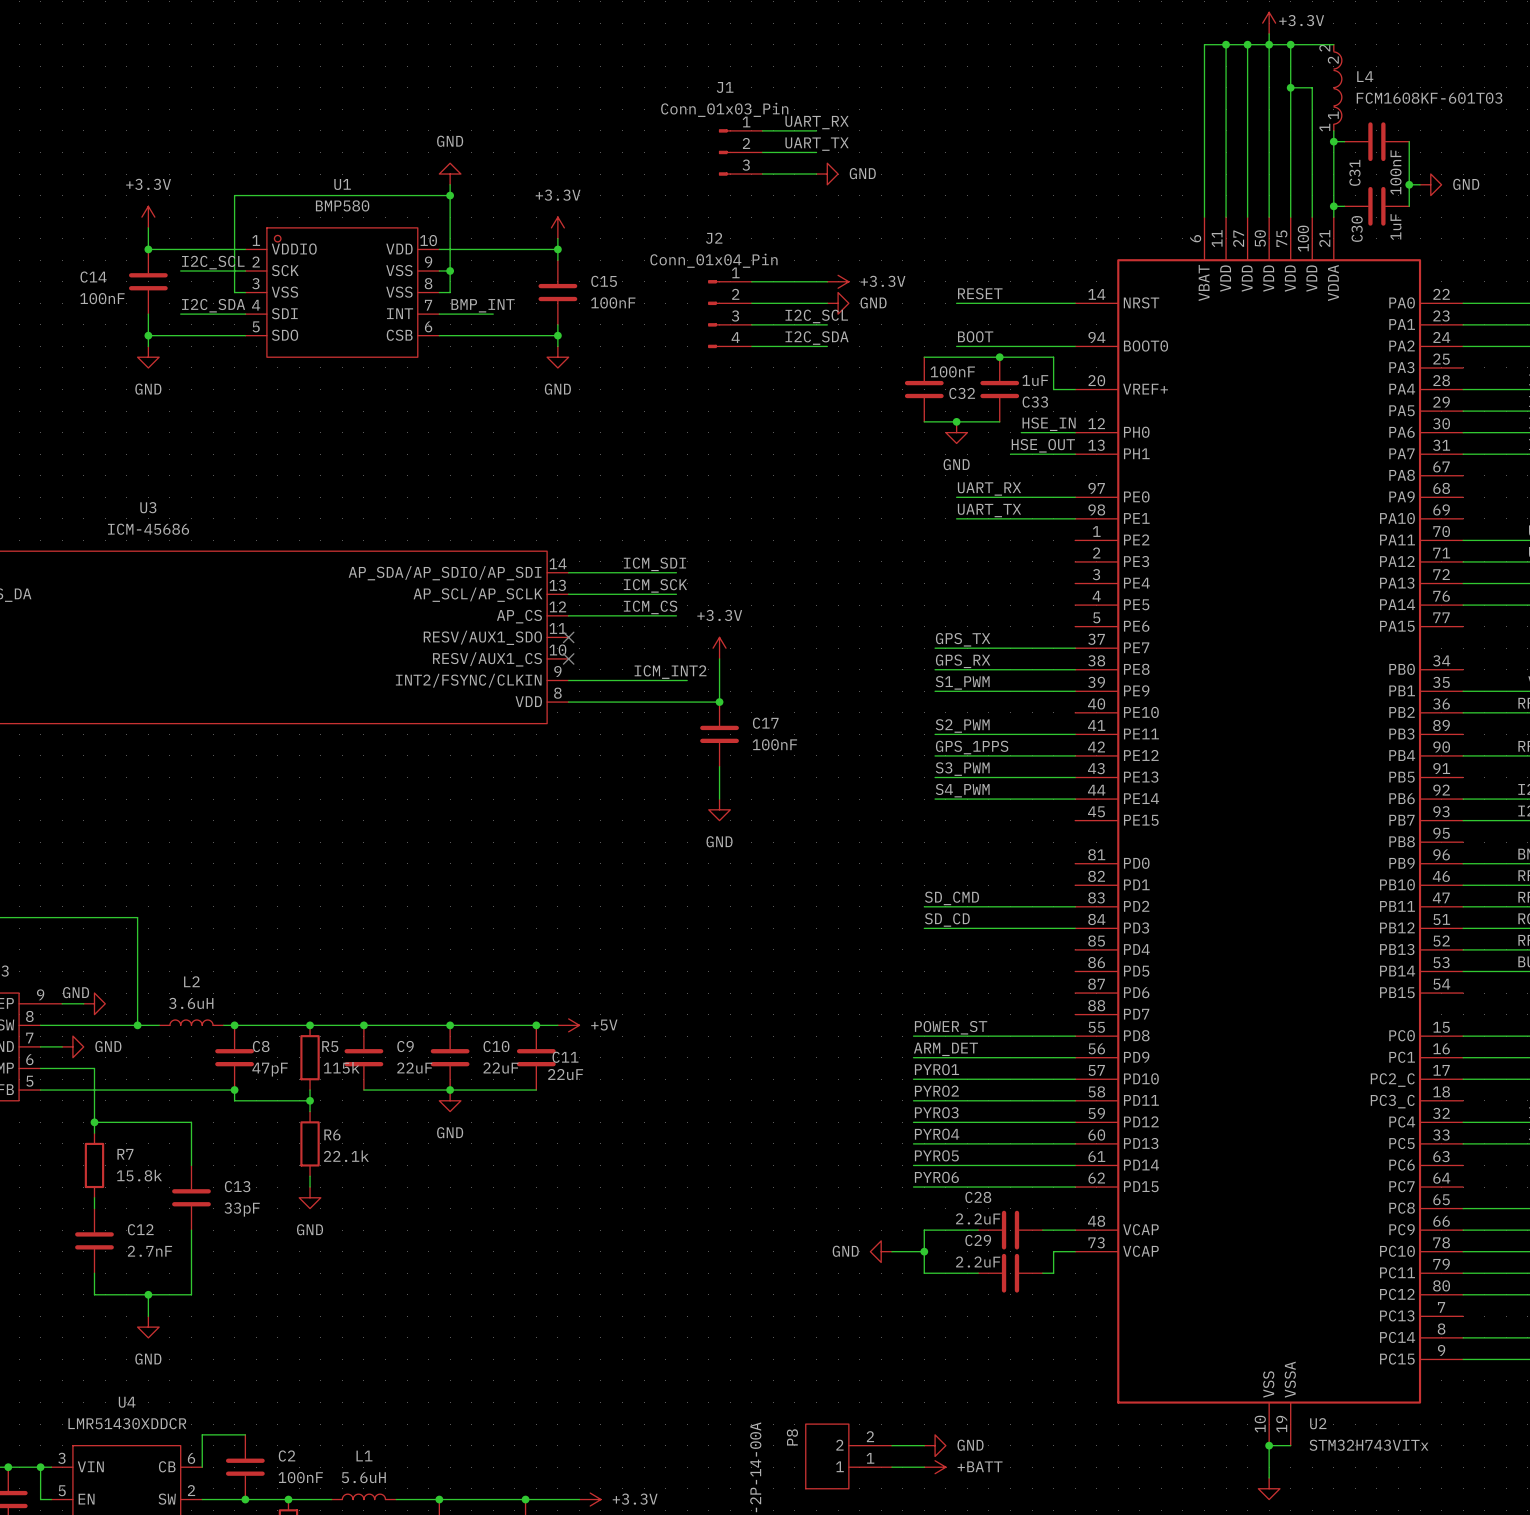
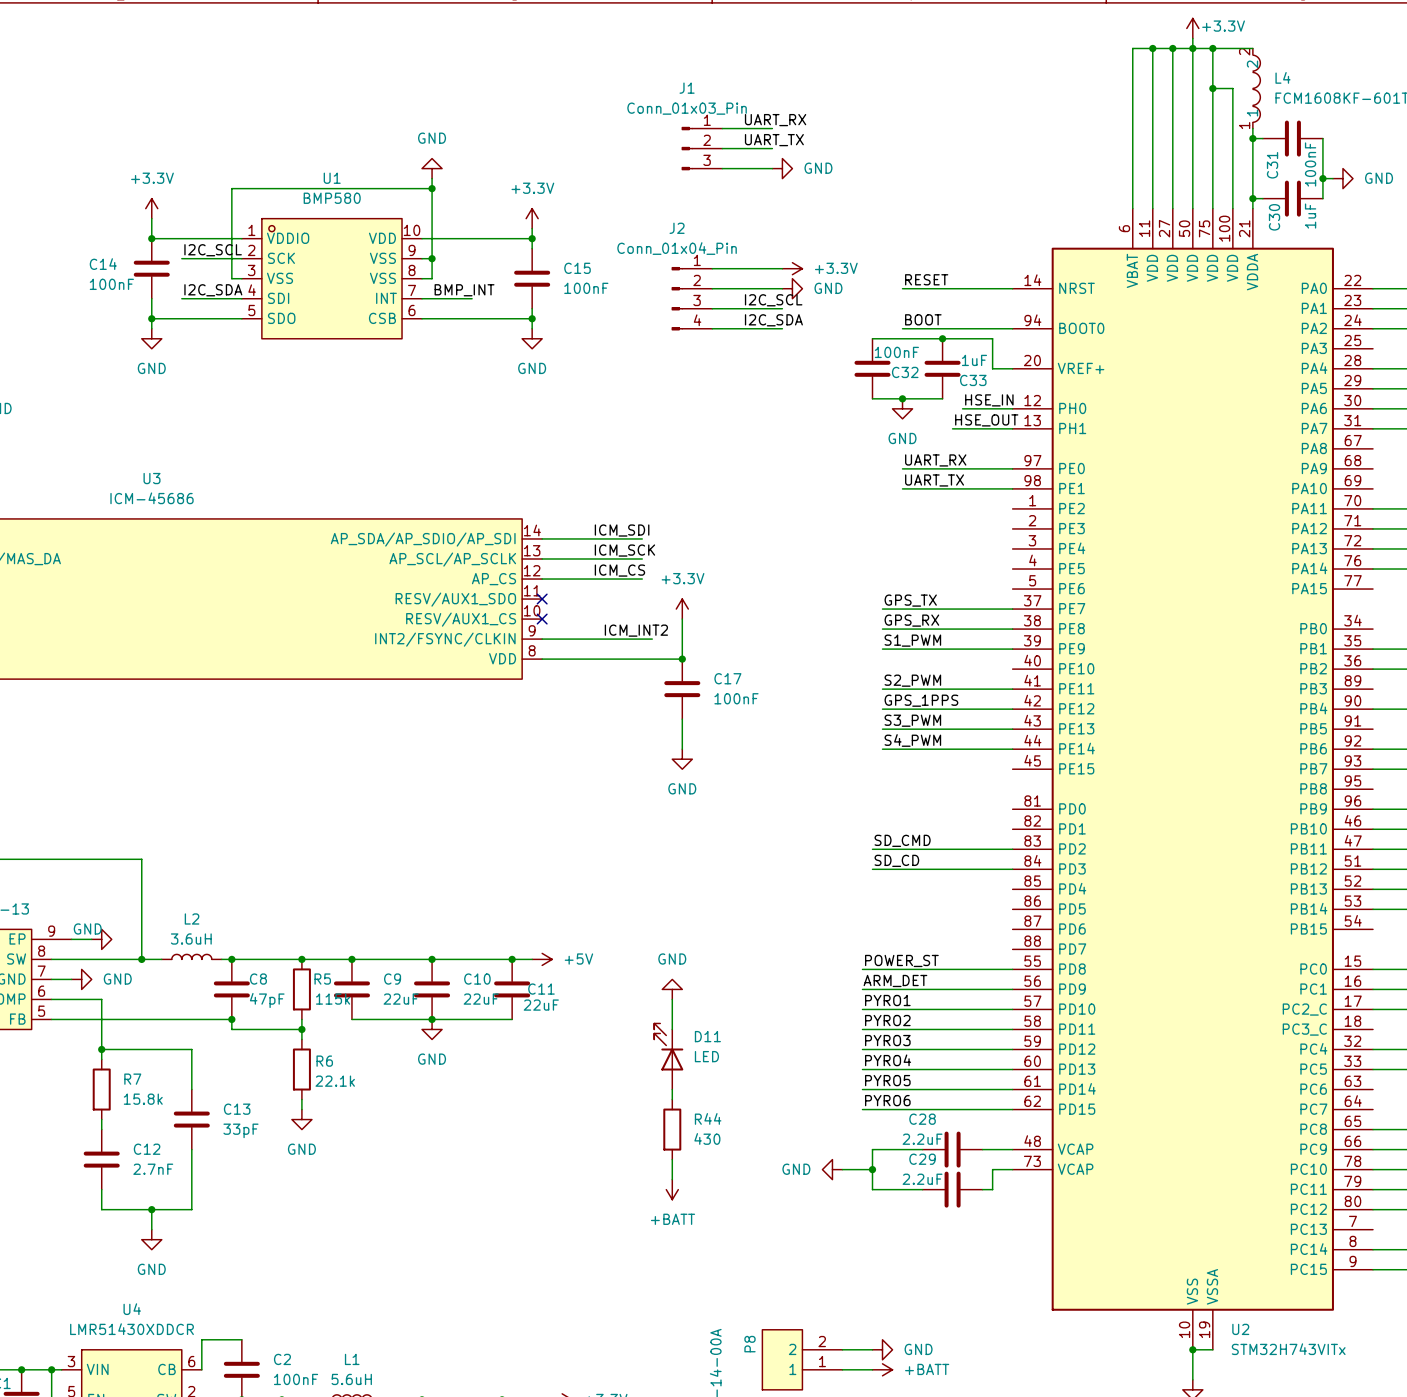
power symbol: none -> GND (672, 989)
wire: none -> (672, 999) (672, 1029)
D11: none -> LED (668, 1056)
wire: none -> (672, 1089) (672, 1099)
R44: none -> 430 (672, 1129)
wire: none -> (672, 1159) (672, 1179)
power symbol: none -> +BATT (672, 1189)

